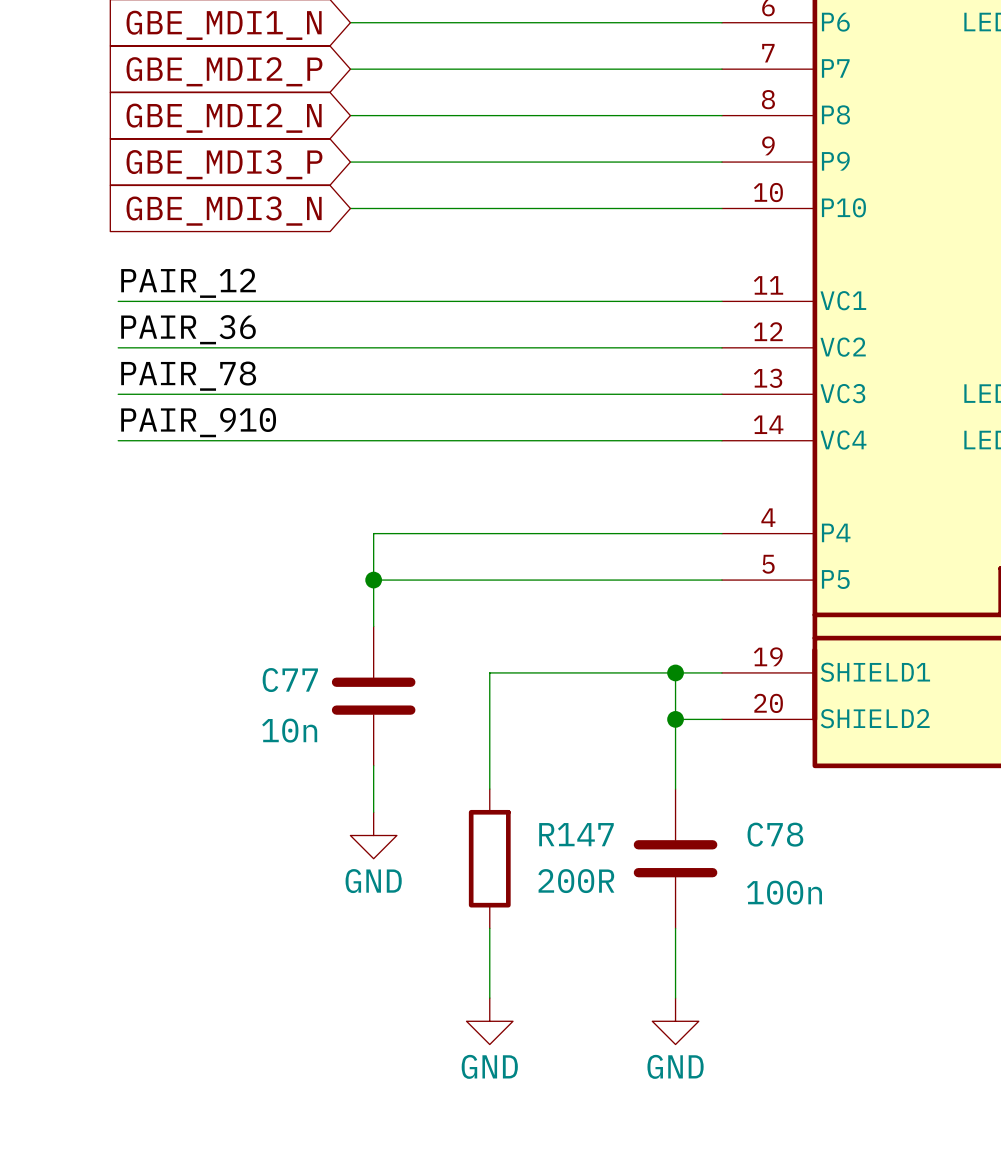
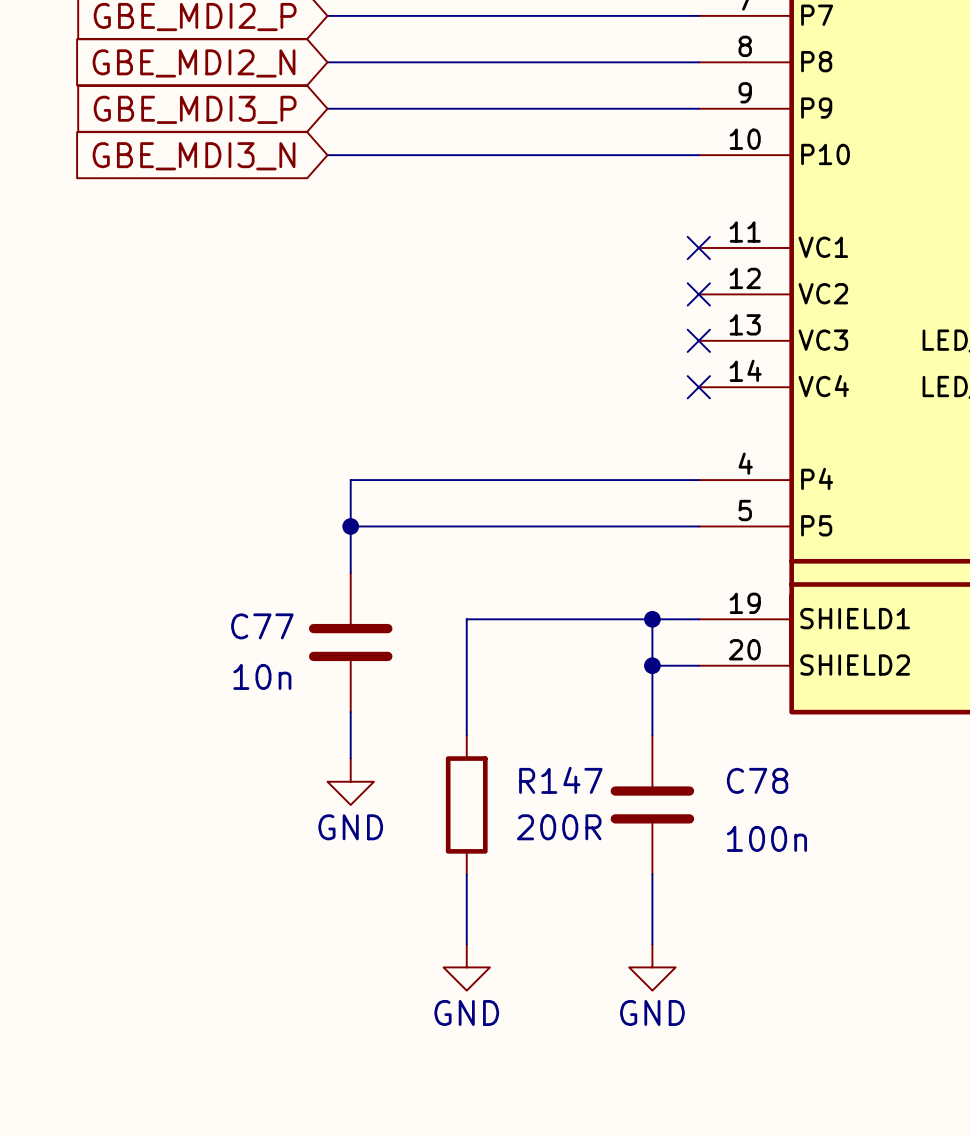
label: PAIR_12 (188, 283) -> none
wire: (118, 301) (721, 301) -> none
no-connect mark: none -> (698, 247)
label: PAIR_36 (188, 329) -> none
wire: (118, 347) (721, 347) -> none
no-connect mark: none -> (698, 294)
label: PAIR_78 (188, 376) -> none
wire: (118, 394) (721, 394) -> none
no-connect mark: none -> (698, 340)
label: PAIR_910 (198, 422) -> none
wire: (118, 440) (721, 440) -> none
no-connect mark: none -> (698, 387)

